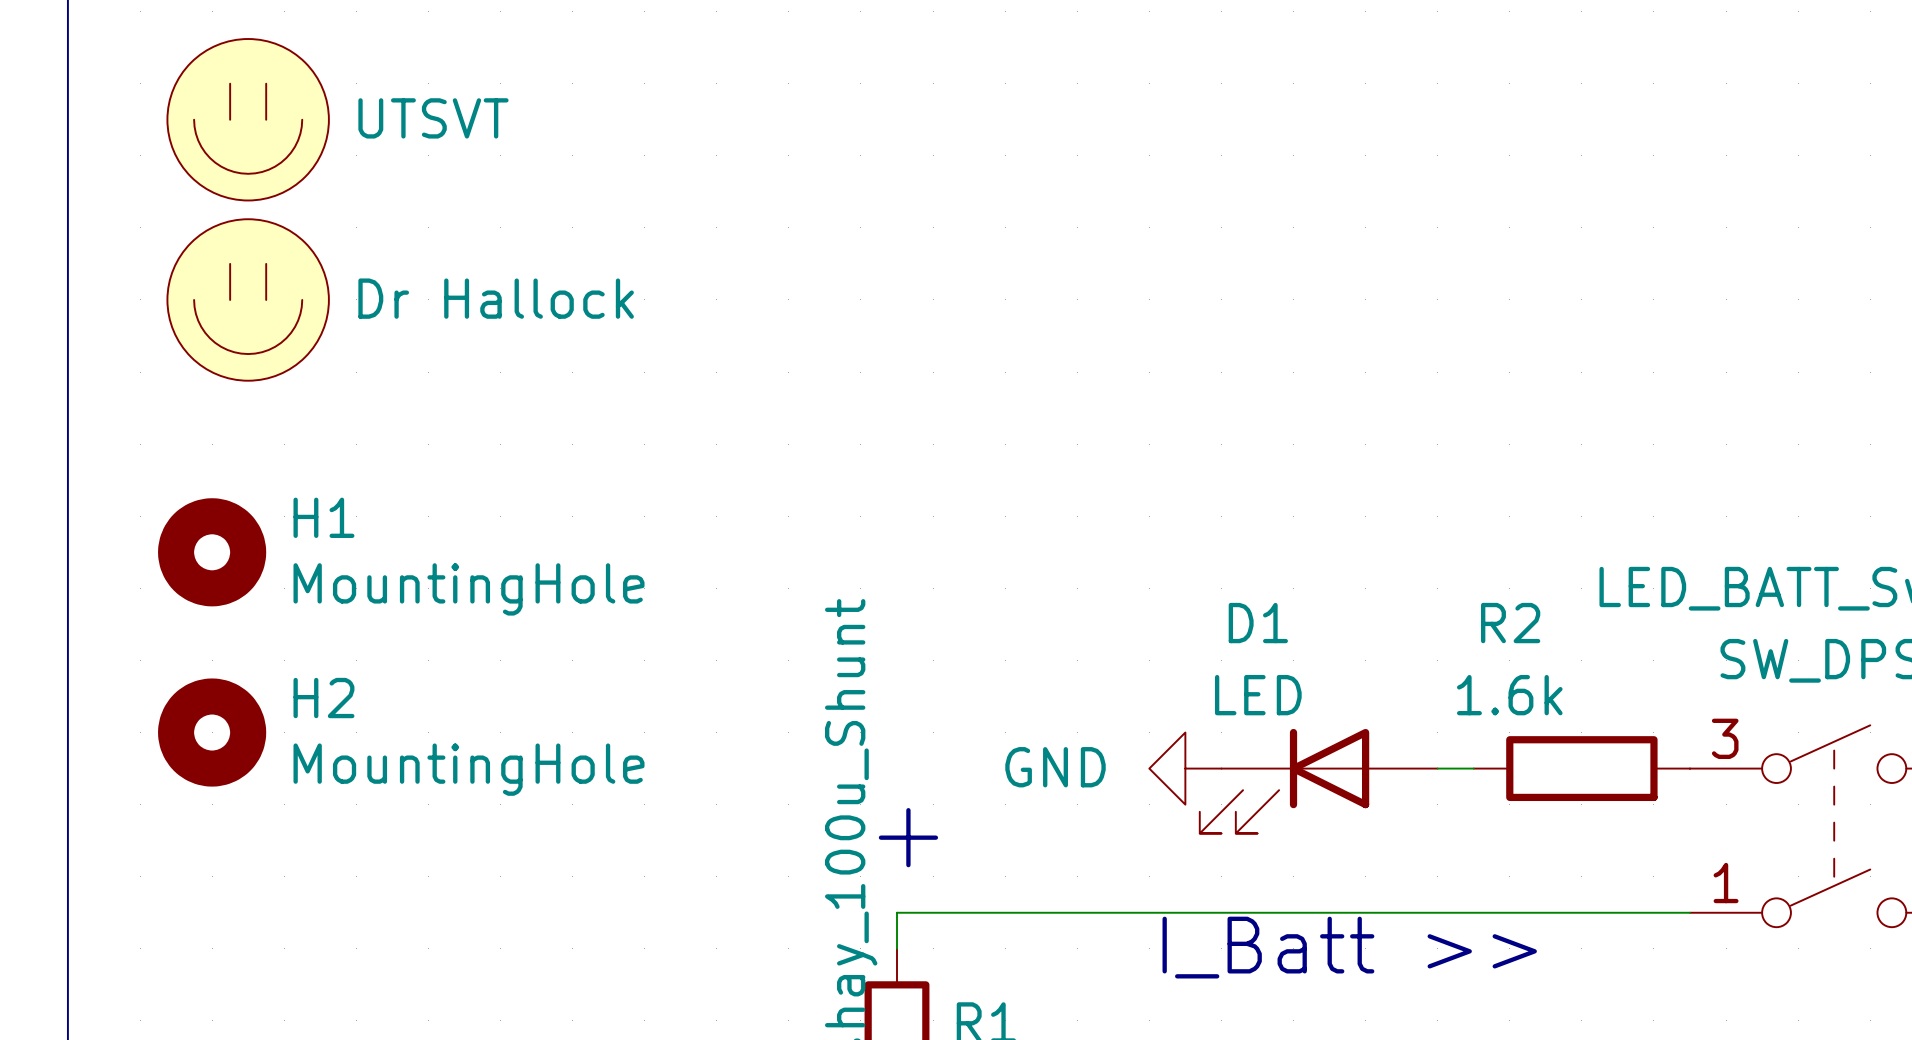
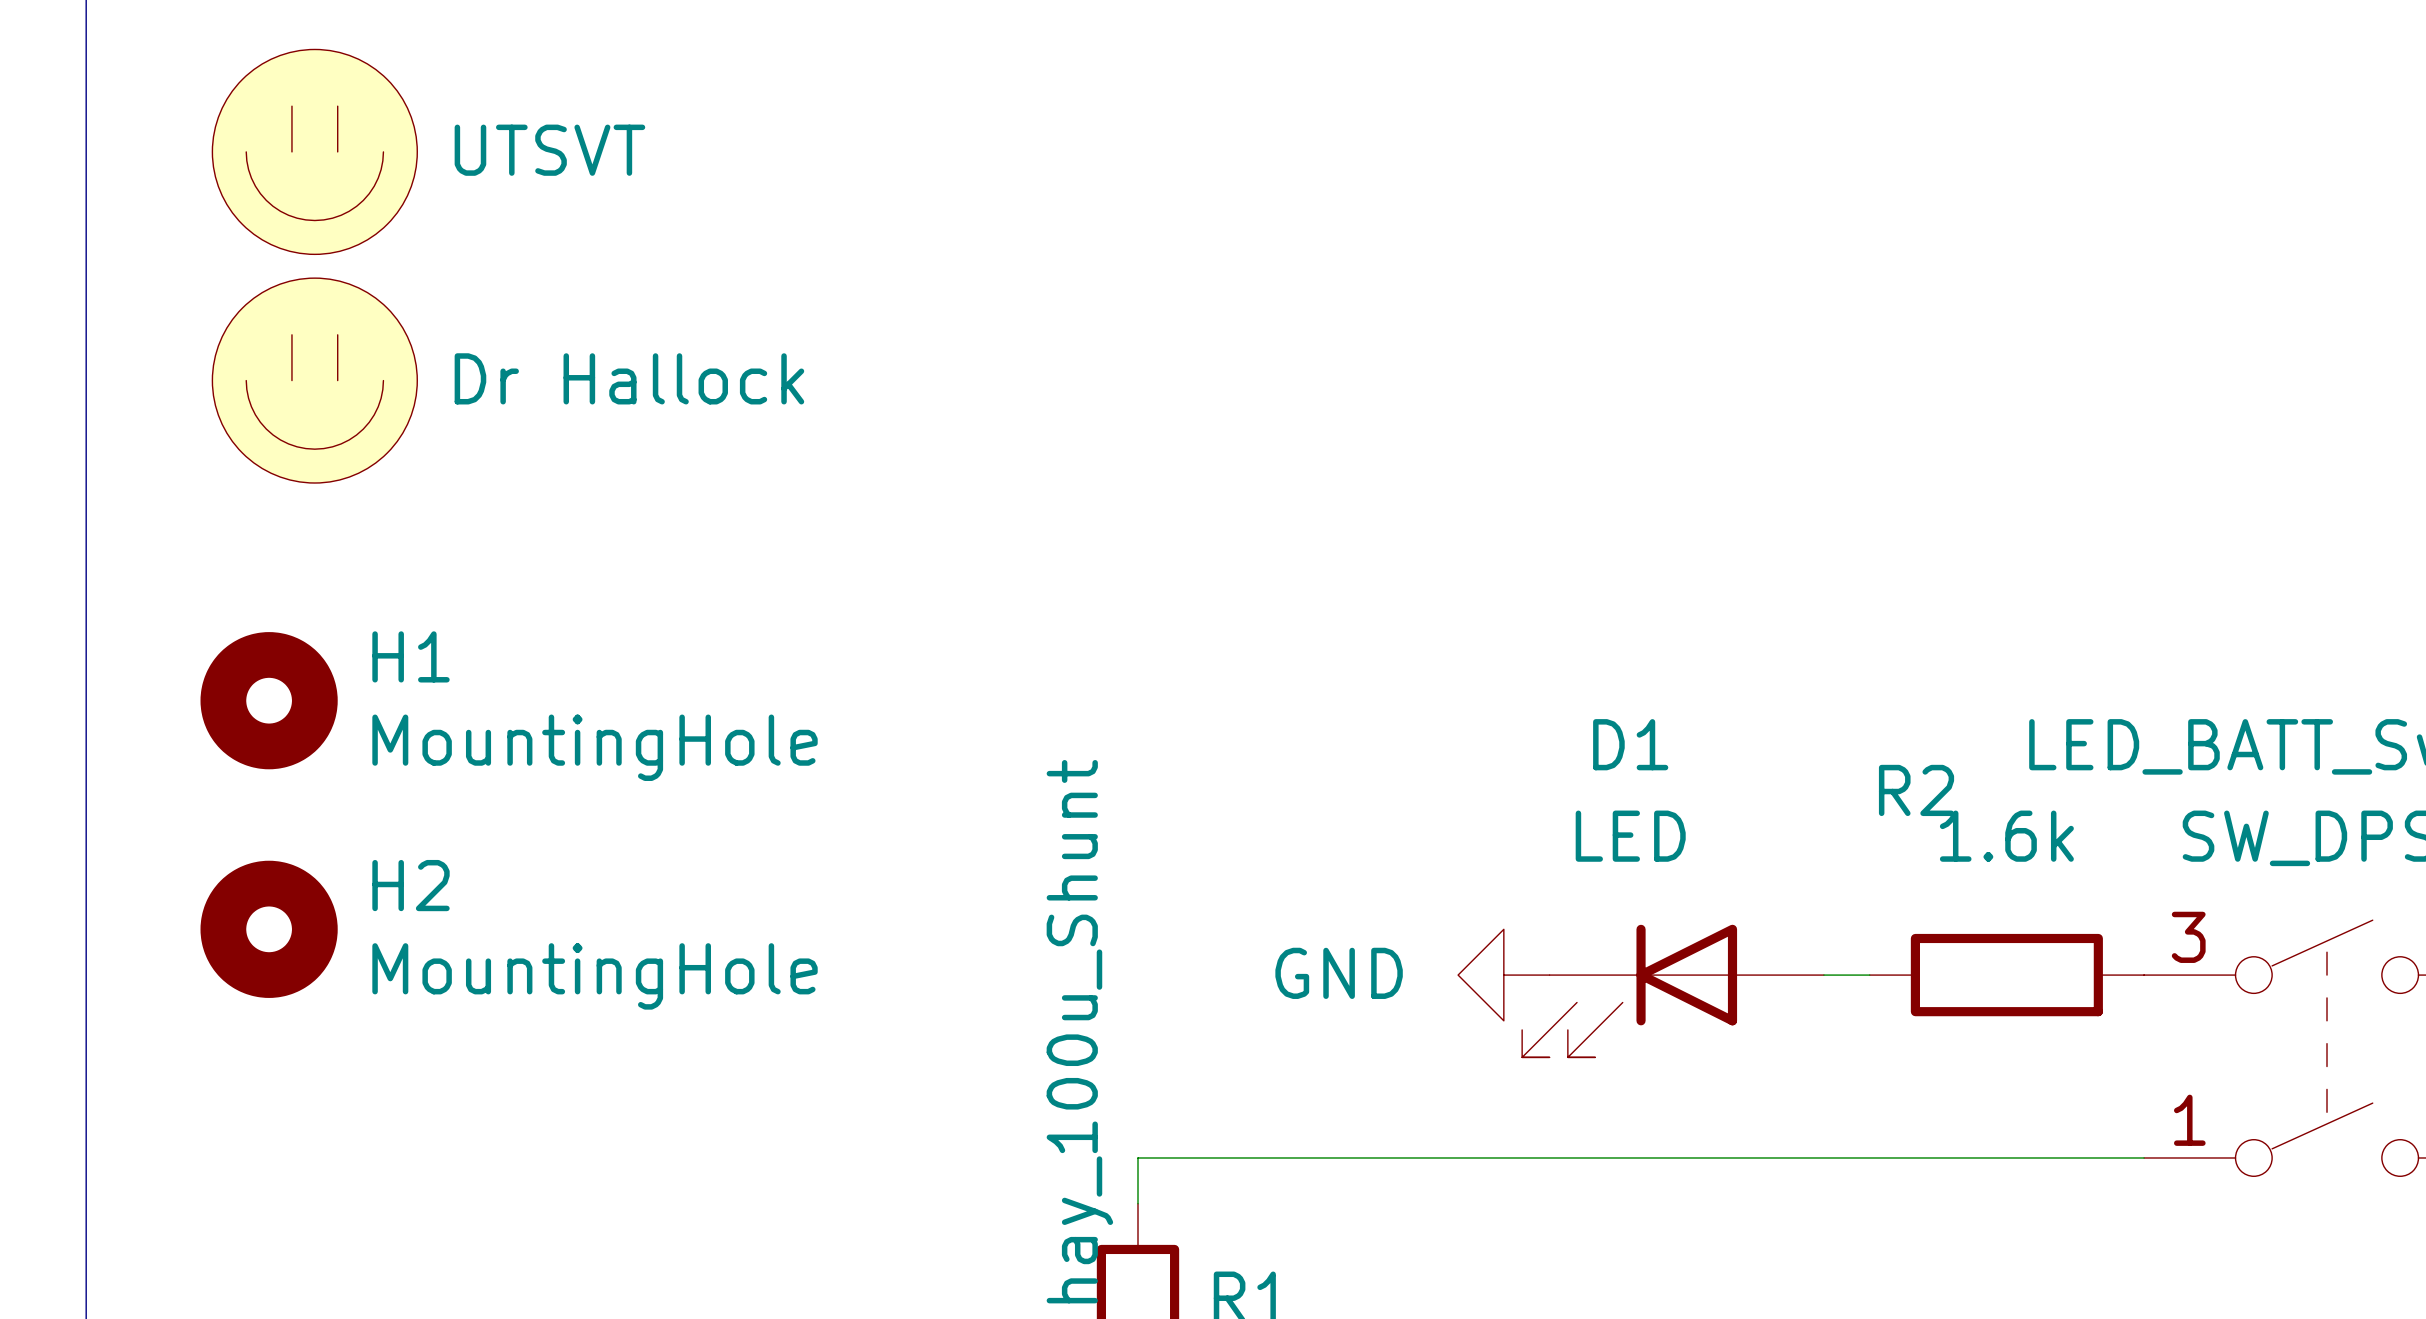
D1 name position: D1 (1258, 623) -> D1 (1630, 744)
D1 value position: LED (1258, 695) -> LED (1630, 836)
R2 value position: 1.6k (1509, 695) -> 1.6k (2006, 836)
text: + (908, 837) -> none
text: I_Batt >> (1349, 947) -> none

